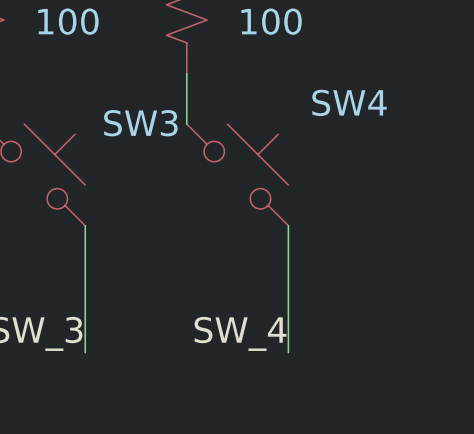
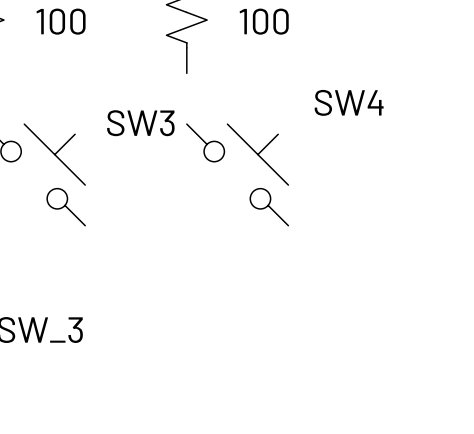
wire: (186, 73) (186, 124) -> none
wire: (85, 225) (85, 352) -> none
wire: (288, 225) (288, 352) -> none
label: SW_4 (240, 333) -> none

